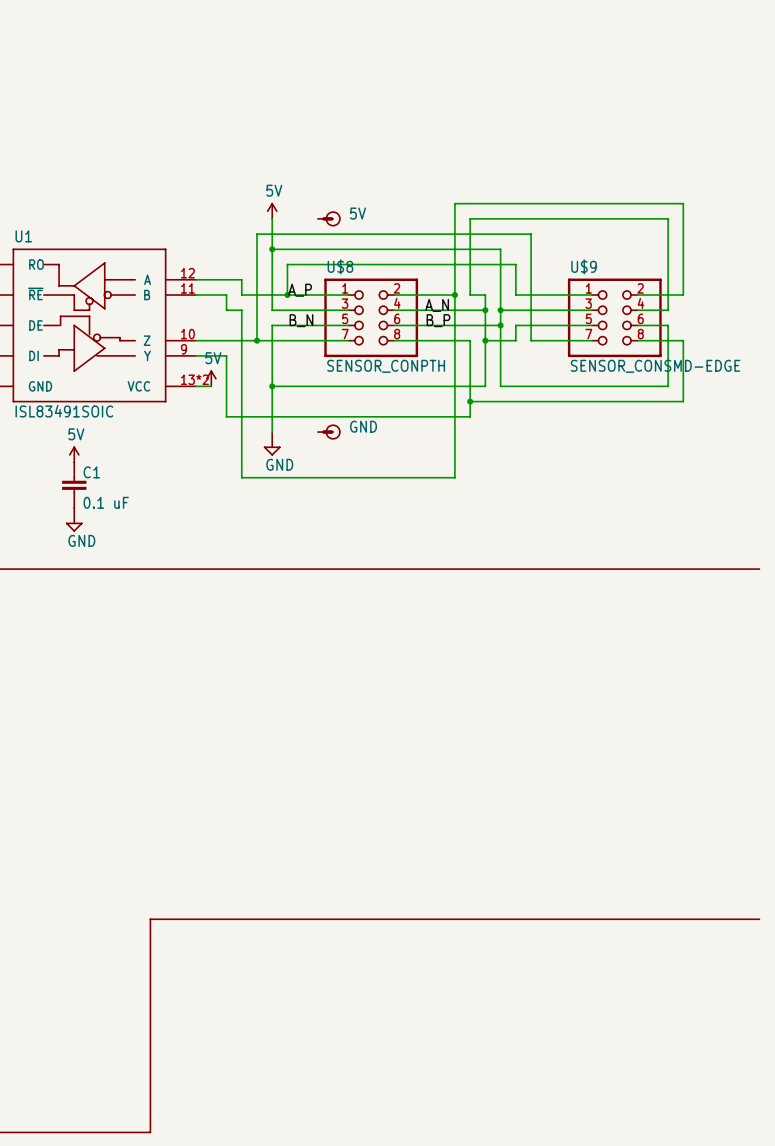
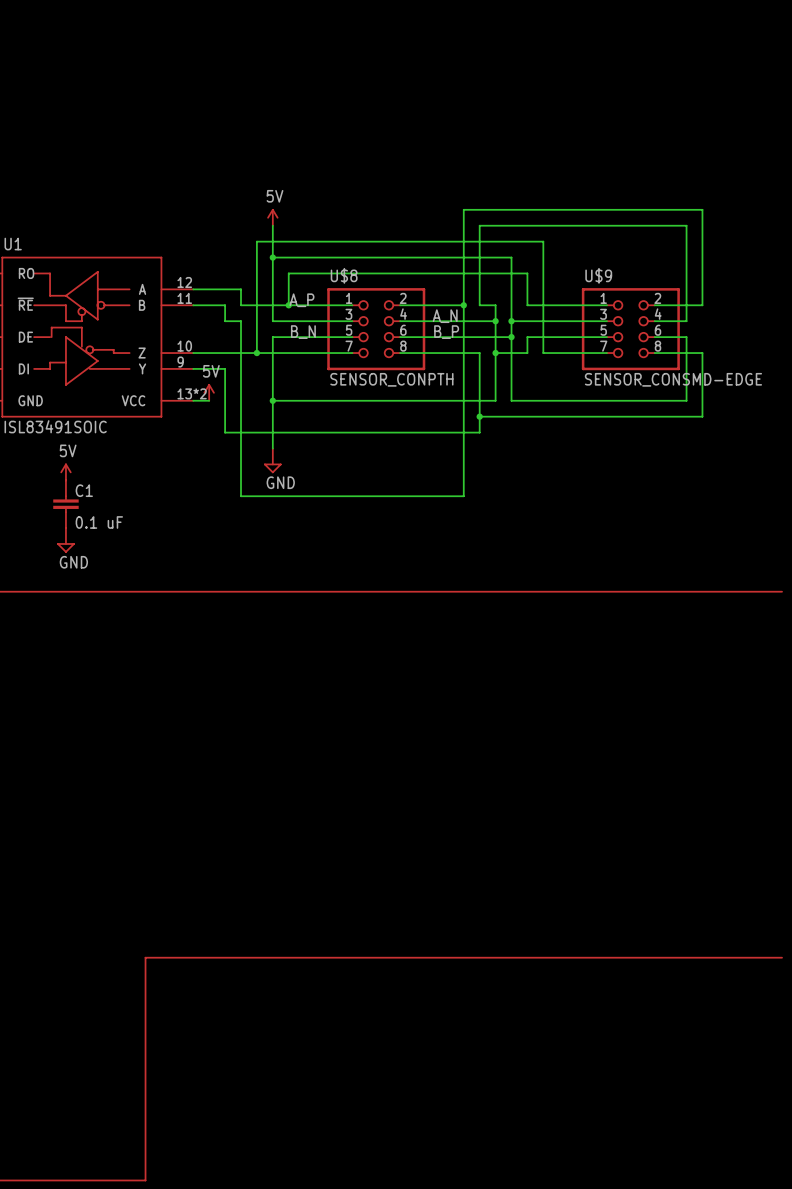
5V: (329, 218) -> none
GND: (329, 432) -> none

